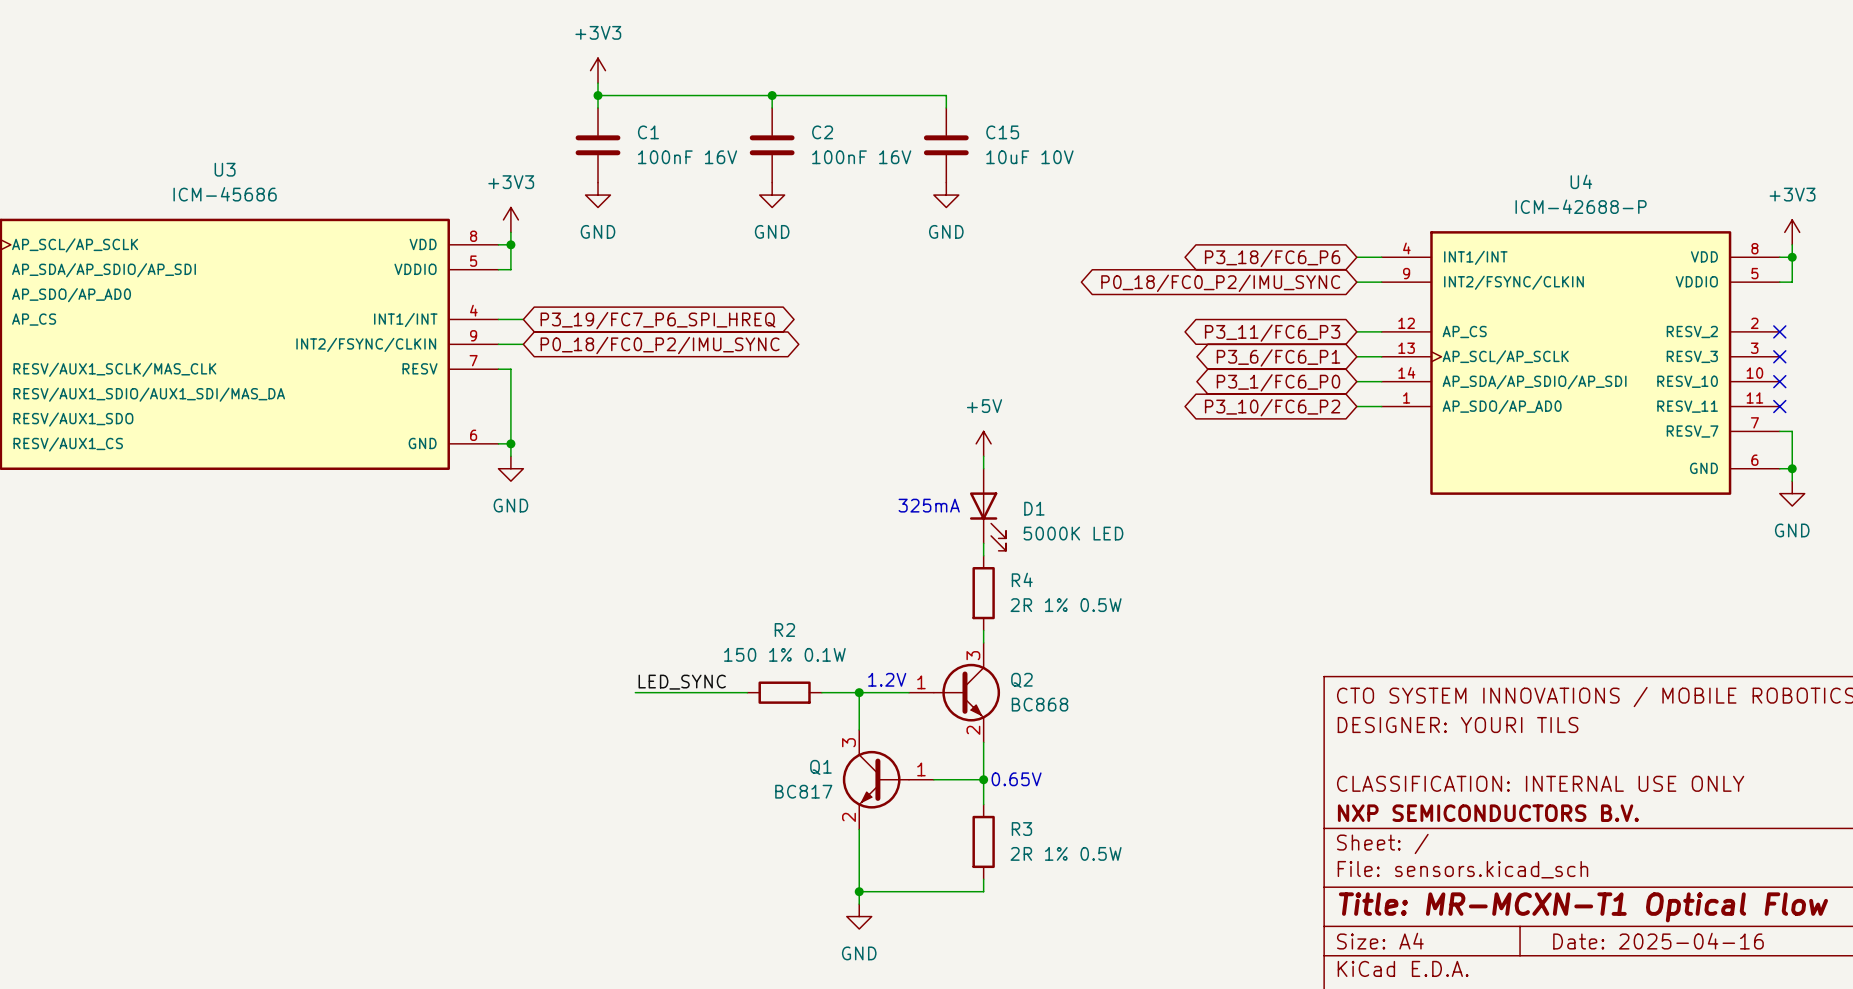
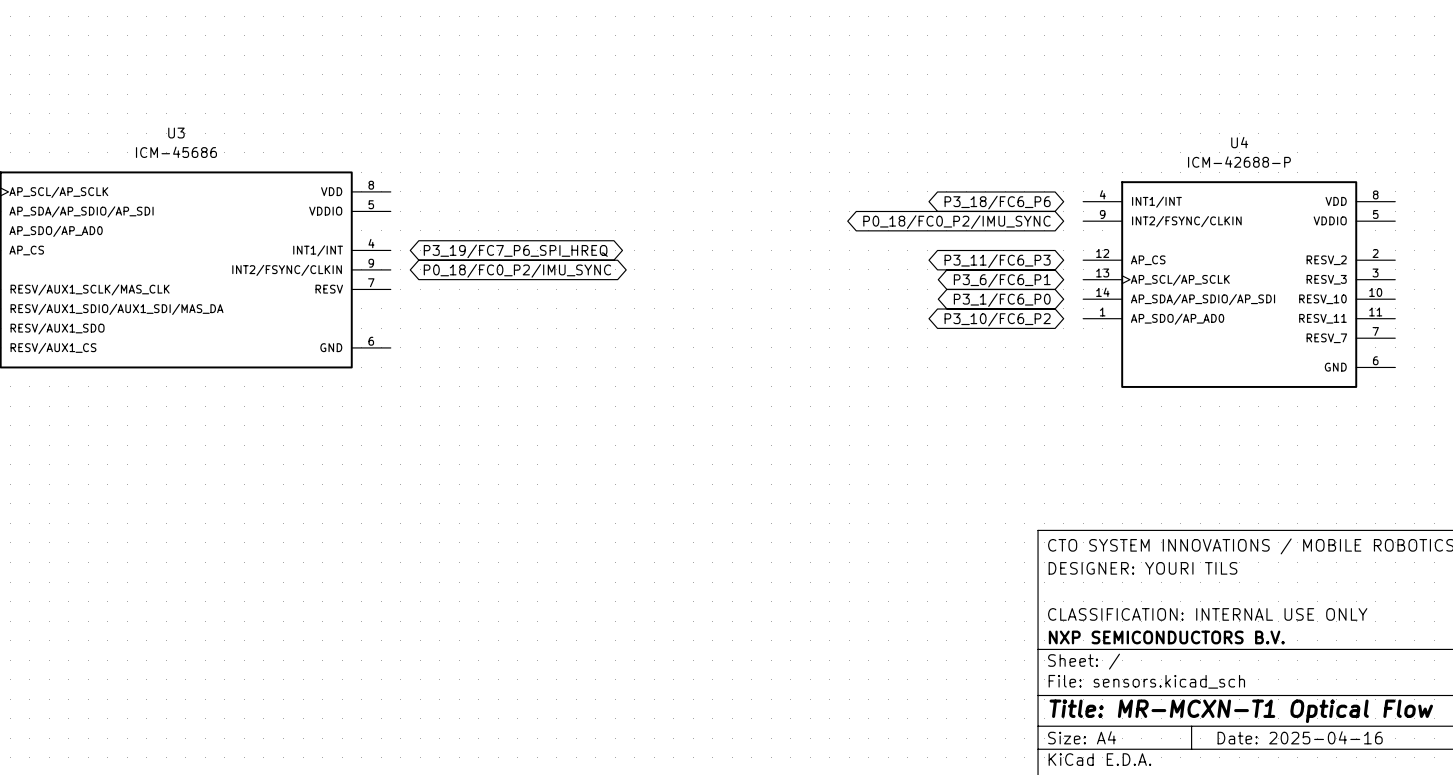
power symbol: +3V3 (598, 70) -> none
wire: (598, 83) (598, 107) -> none
wire: (598, 95) (946, 95) (946, 107) -> none
junction: (598, 95) -> none
wire: (772, 95) (772, 107) -> none
junction: (772, 95) -> none
C1: 100nF 16V (598, 145) -> none
C2: 100nF 16V (772, 145) -> none
C15: 10uF 10V (946, 145) -> none
power symbol: GND (598, 195) -> none
power symbol: GND (772, 195) -> none
power symbol: GND (946, 195) -> none
power symbol: +3V3 (510, 219) -> none
wire: (510, 232) (510, 269) (498, 269) -> none
power symbol: +3V3 (1792, 232) -> none
wire: (498, 244) (510, 244) -> none
junction: (510, 244) -> none
wire: (1792, 244) (1792, 282) (1779, 282) -> none
wire: (1356, 257) (1381, 257) -> none
wire: (1779, 257) (1792, 257) -> none
junction: (1792, 257) -> none
wire: (1356, 282) (1381, 282) -> none
wire: (498, 319) (523, 319) -> none
wire: (1356, 331) (1381, 331) -> none
no-connect mark: (1779, 331) -> none
wire: (498, 344) (523, 344) -> none
wire: (1356, 356) (1381, 356) -> none
no-connect mark: (1779, 356) -> none
wire: (498, 369) (510, 369) (510, 456) -> none
wire: (1356, 381) (1381, 381) -> none
no-connect mark: (1779, 381) -> none
wire: (1356, 406) (1381, 406) -> none
no-connect mark: (1779, 406) -> none
wire: (1779, 431) (1792, 431) (1792, 481) -> none
wire: (498, 443) (510, 443) -> none
junction: (510, 443) -> none
power symbol: +5V (983, 443) -> none
wire: (983, 456) (983, 468) -> none
power symbol: GND (510, 468) -> none
wire: (1779, 468) (1792, 468) -> none
junction: (1792, 468) -> none
power symbol: GND (1792, 493) -> none
text: 325mA (929, 505) -> none
D1: 5000K LED (987, 509) -> none
wire: (983, 543) (983, 555) -> none
R4: 2R 1% 0.5W (983, 593) -> none
wire: (983, 630) (983, 642) -> none
text: 1.2V (887, 679) -> none
label: LED_SYNC (682, 682) -> none
wire: (635, 692) (747, 692) -> none
R2: 150 1% 0.1W (784, 692) -> none
wire: (821, 692) (909, 692) -> none
wire: (859, 692) (859, 729) -> none
junction: (859, 692) -> none
Q2: BC868 (954, 692) -> none
wire: (983, 742) (983, 804) -> none
Q1: BC817 (888, 779) -> none
wire: (933, 779) (983, 779) -> none
junction: (983, 779) -> none
text: 0.65V (1016, 779) -> none
wire: (859, 829) (859, 904) -> none
R3: 2R 1% 0.5W (983, 841) -> none
wire: (983, 879) (983, 891) (859, 891) -> none
junction: (859, 891) -> none
power symbol: GND (859, 916) -> none

